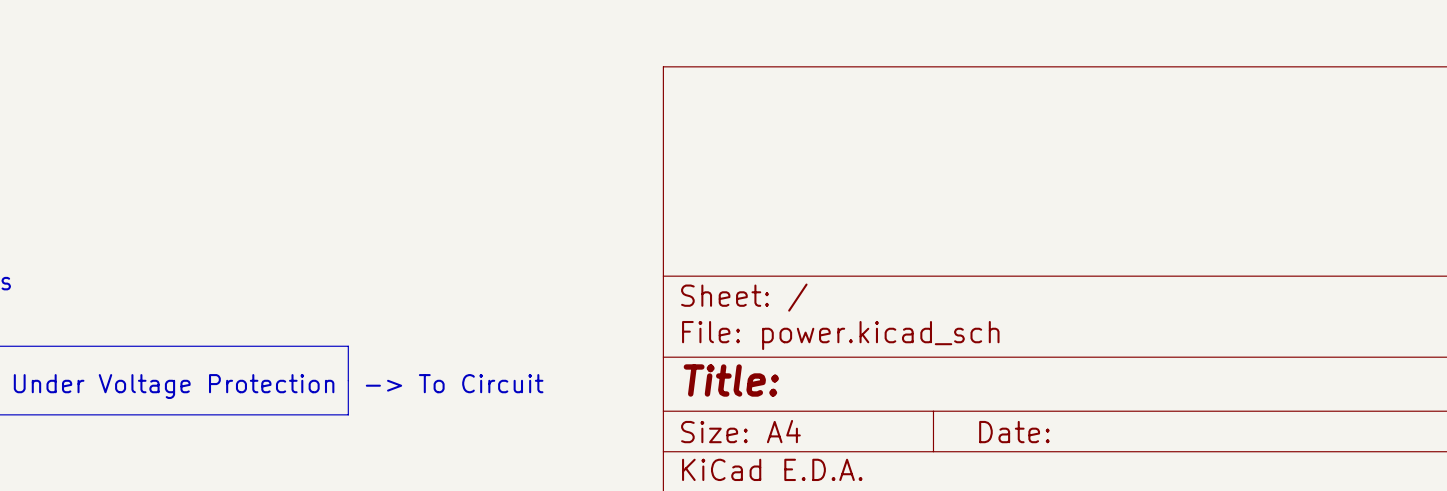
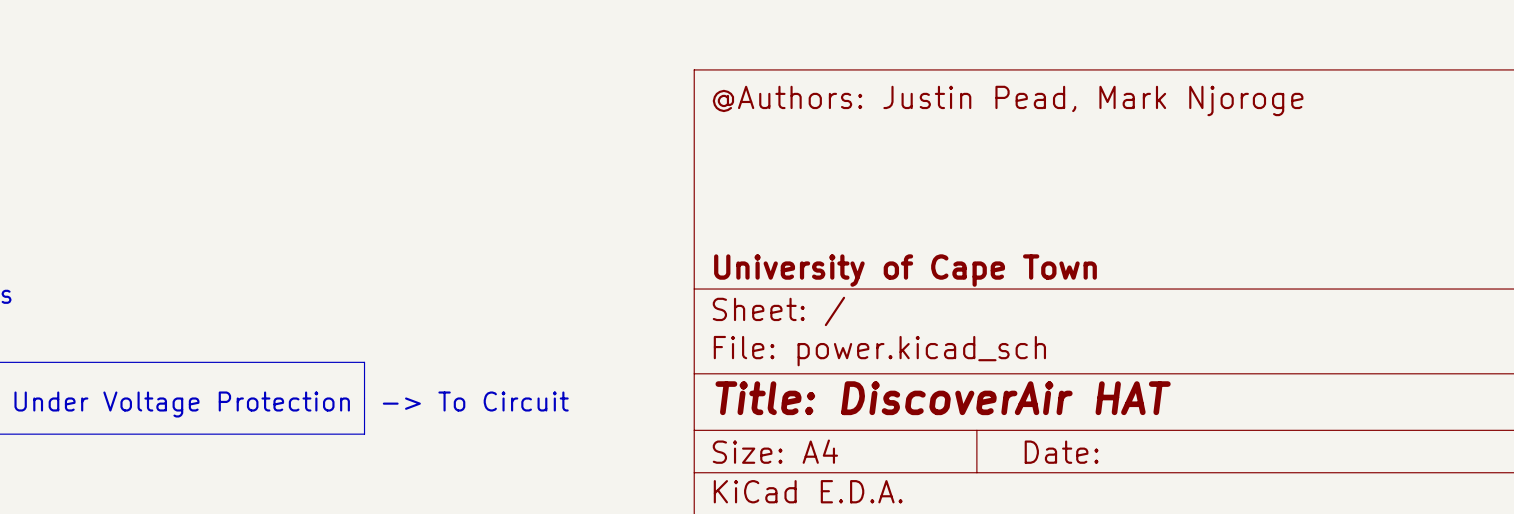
title block: none -> @Authors: Justin Pead, Mark Njoroge (1008, 100)
title block: none -> University of Cape Town (905, 270)
title block: Title: (731, 380) -> Title: DiscoverAir HAT (943, 398)

